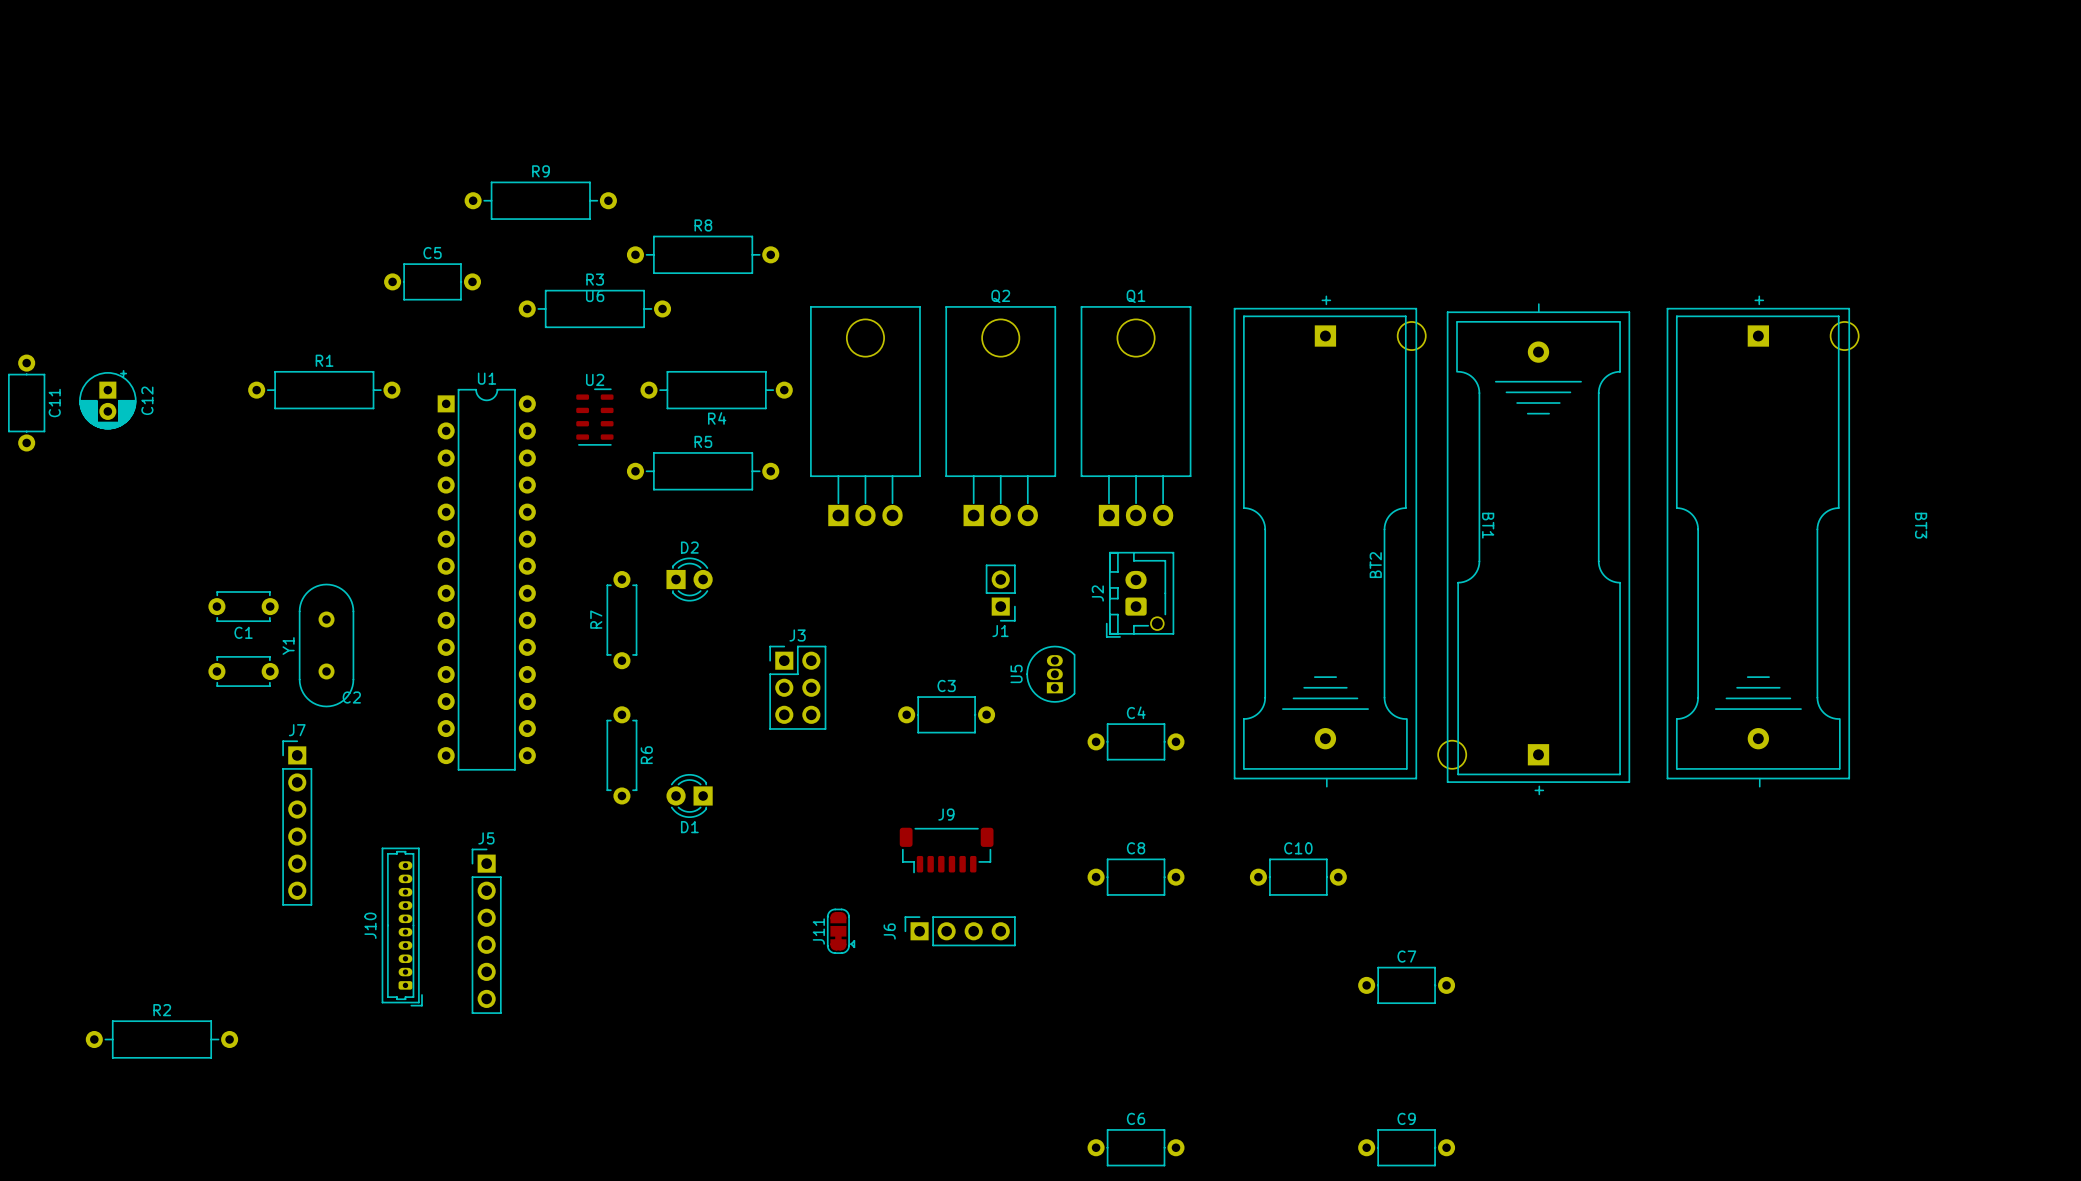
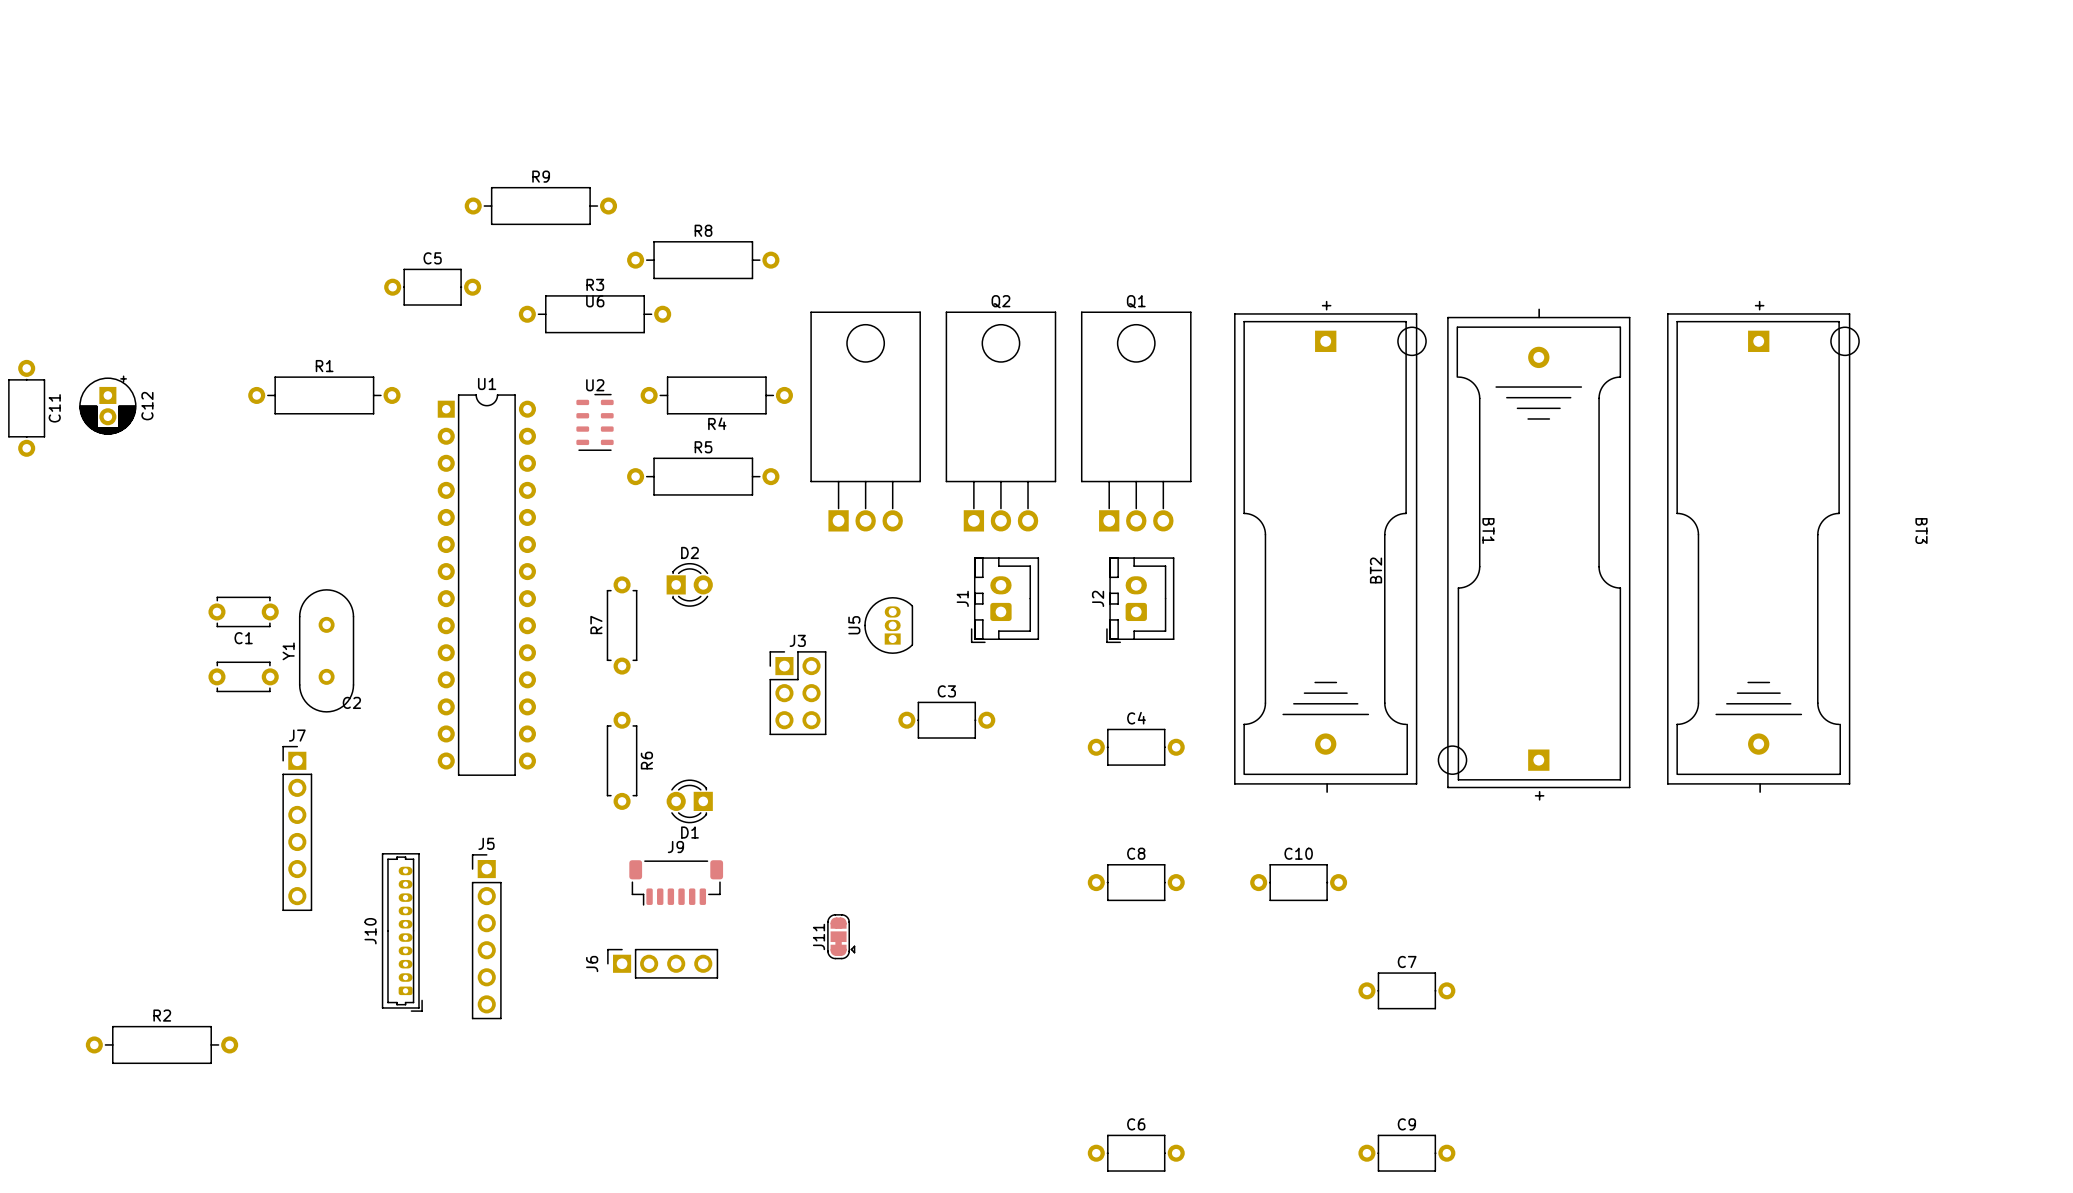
J2 footprint: [1106, 552, 1175, 638] -> [1106, 557, 1175, 643]
J1 footprint: [985, 564, 1016, 622] -> [971, 557, 1039, 643]
J1 name position: J1 (1000, 631) -> J1 (962, 598)
U5 position: (1050, 674) -> (888, 625)
J9 position: (946, 850) -> (676, 882)
J6 position: (960, 931) -> (662, 963)

